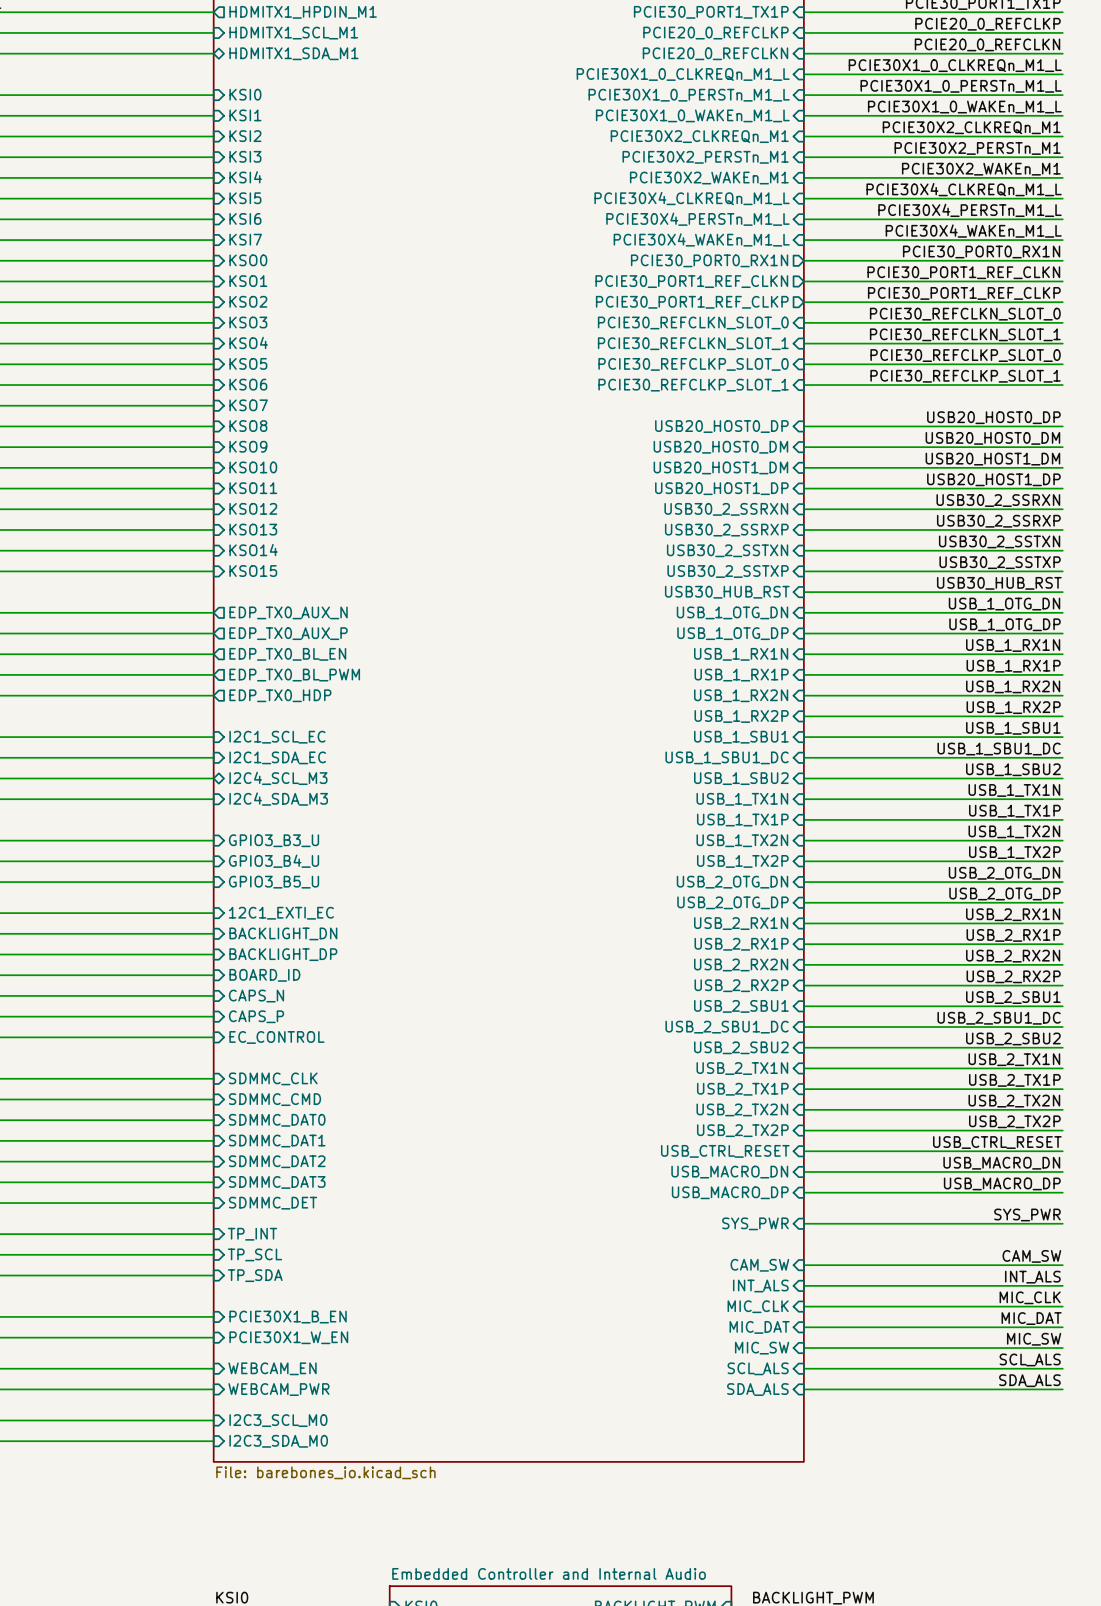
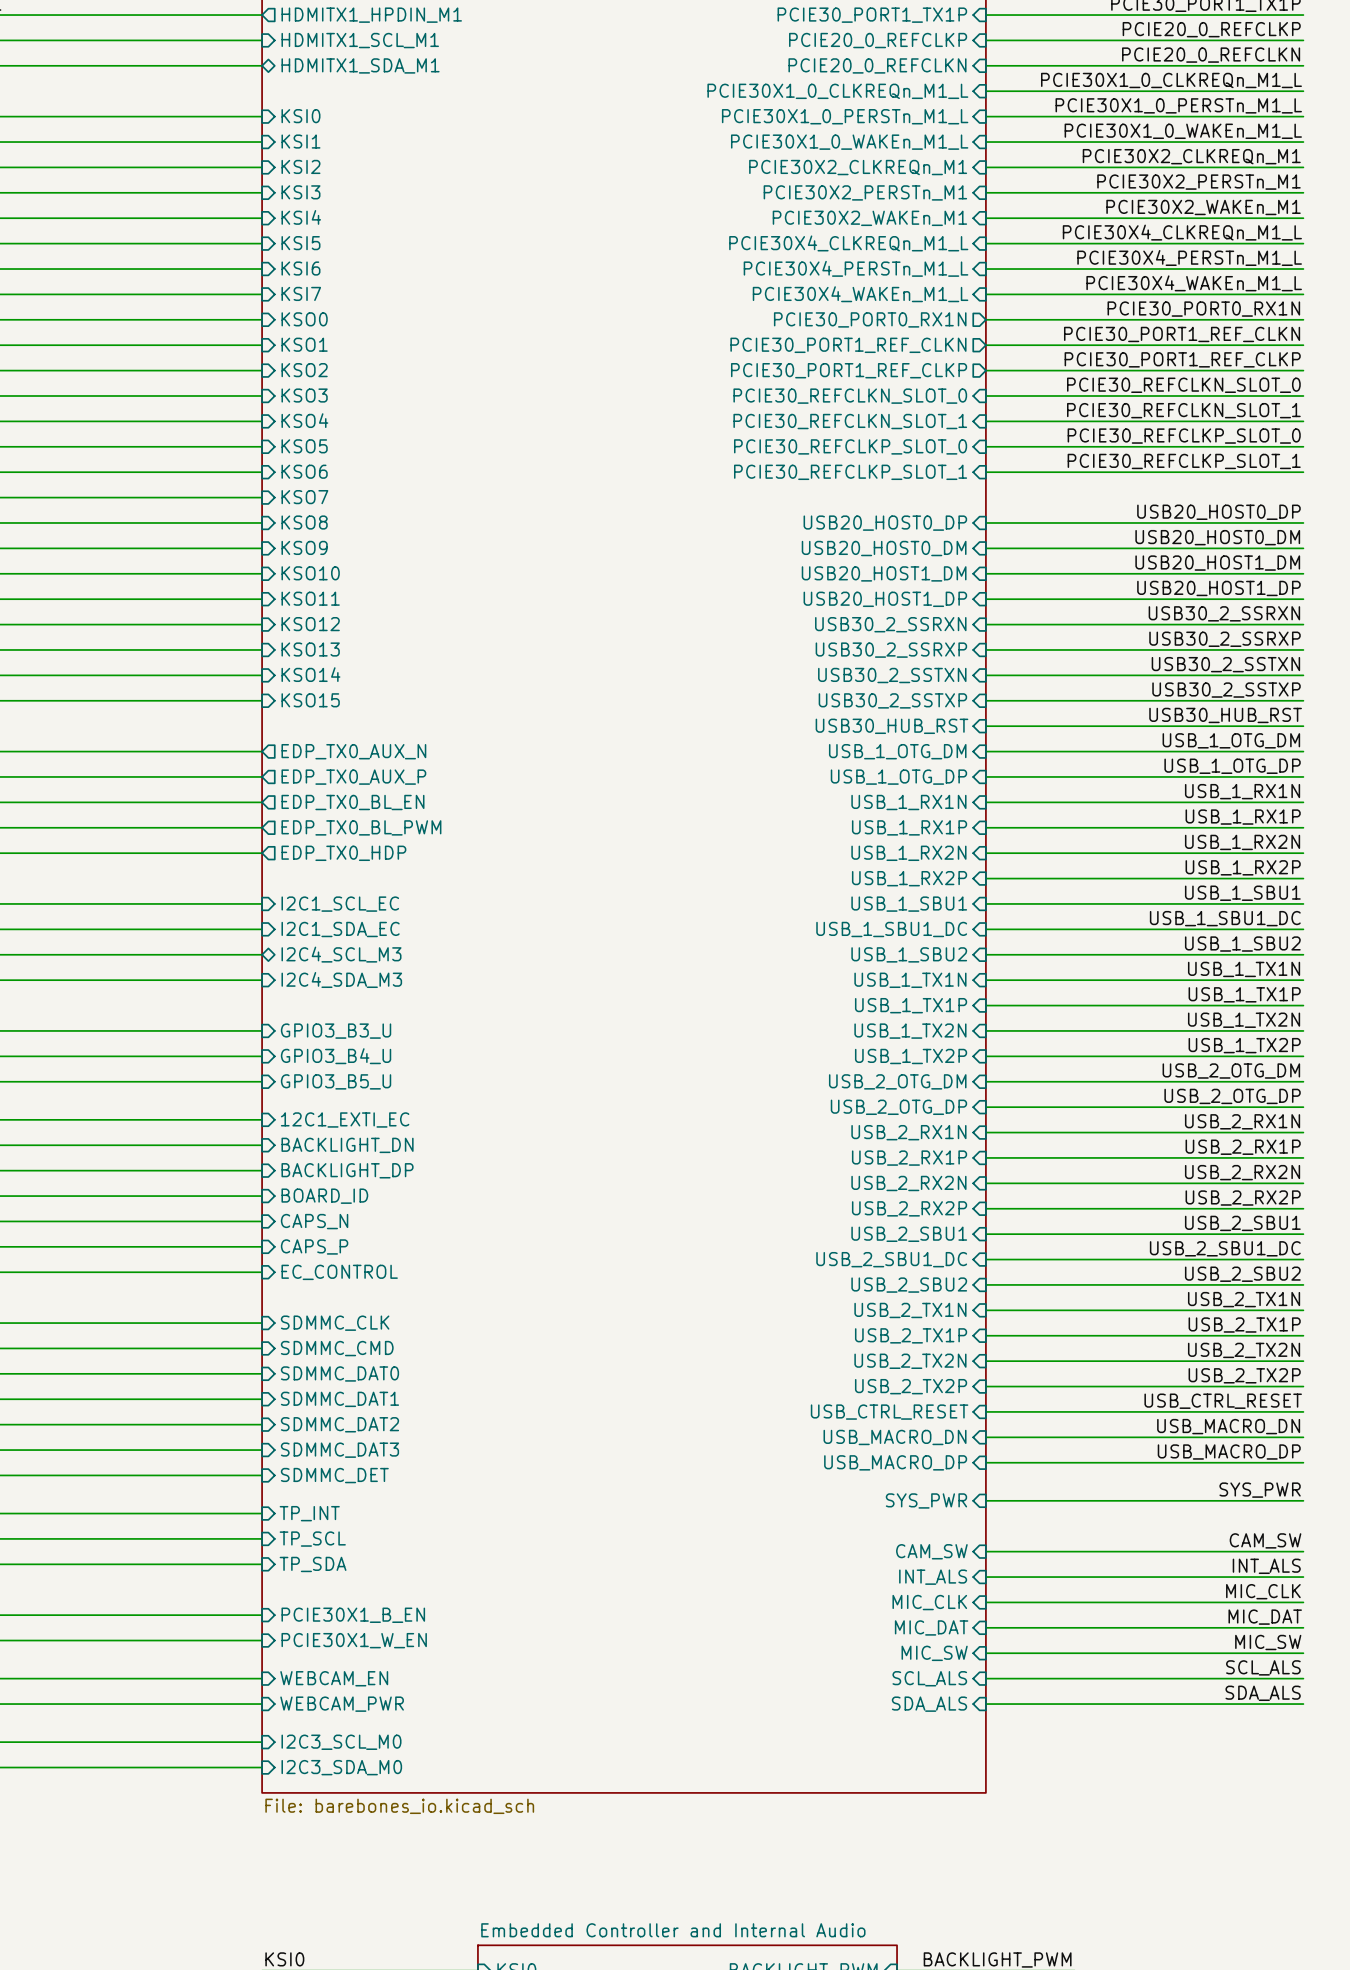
label: USB_1_OTG_DN (1004, 604) -> USB_1_OTG_DM (1231, 740)
sheet pin: USB_1_OTG_DN (732, 612) -> USB_1_OTG_DM (897, 751)
label: USB_2_OTG_DN (1004, 873) -> USB_2_OTG_DM (1231, 1071)
sheet pin: USB_2_OTG_DN (732, 882) -> USB_2_OTG_DM (897, 1081)

